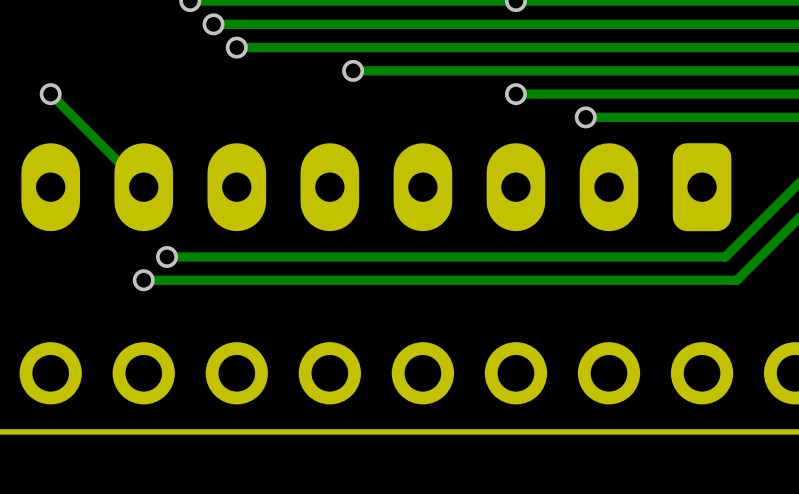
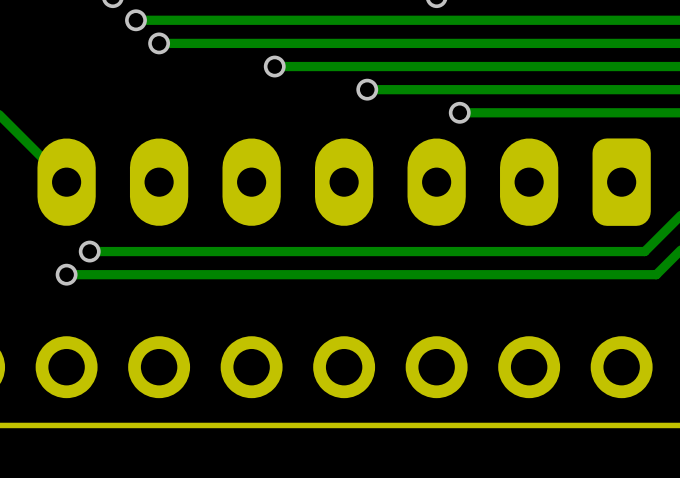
via: none -> (367, 89)
track: none -> (436, 89) (367, 89)
via: (515, 94) -> none
via: none -> (459, 112)
track: none -> (506, 112) (459, 112)
via: (585, 117) -> none

